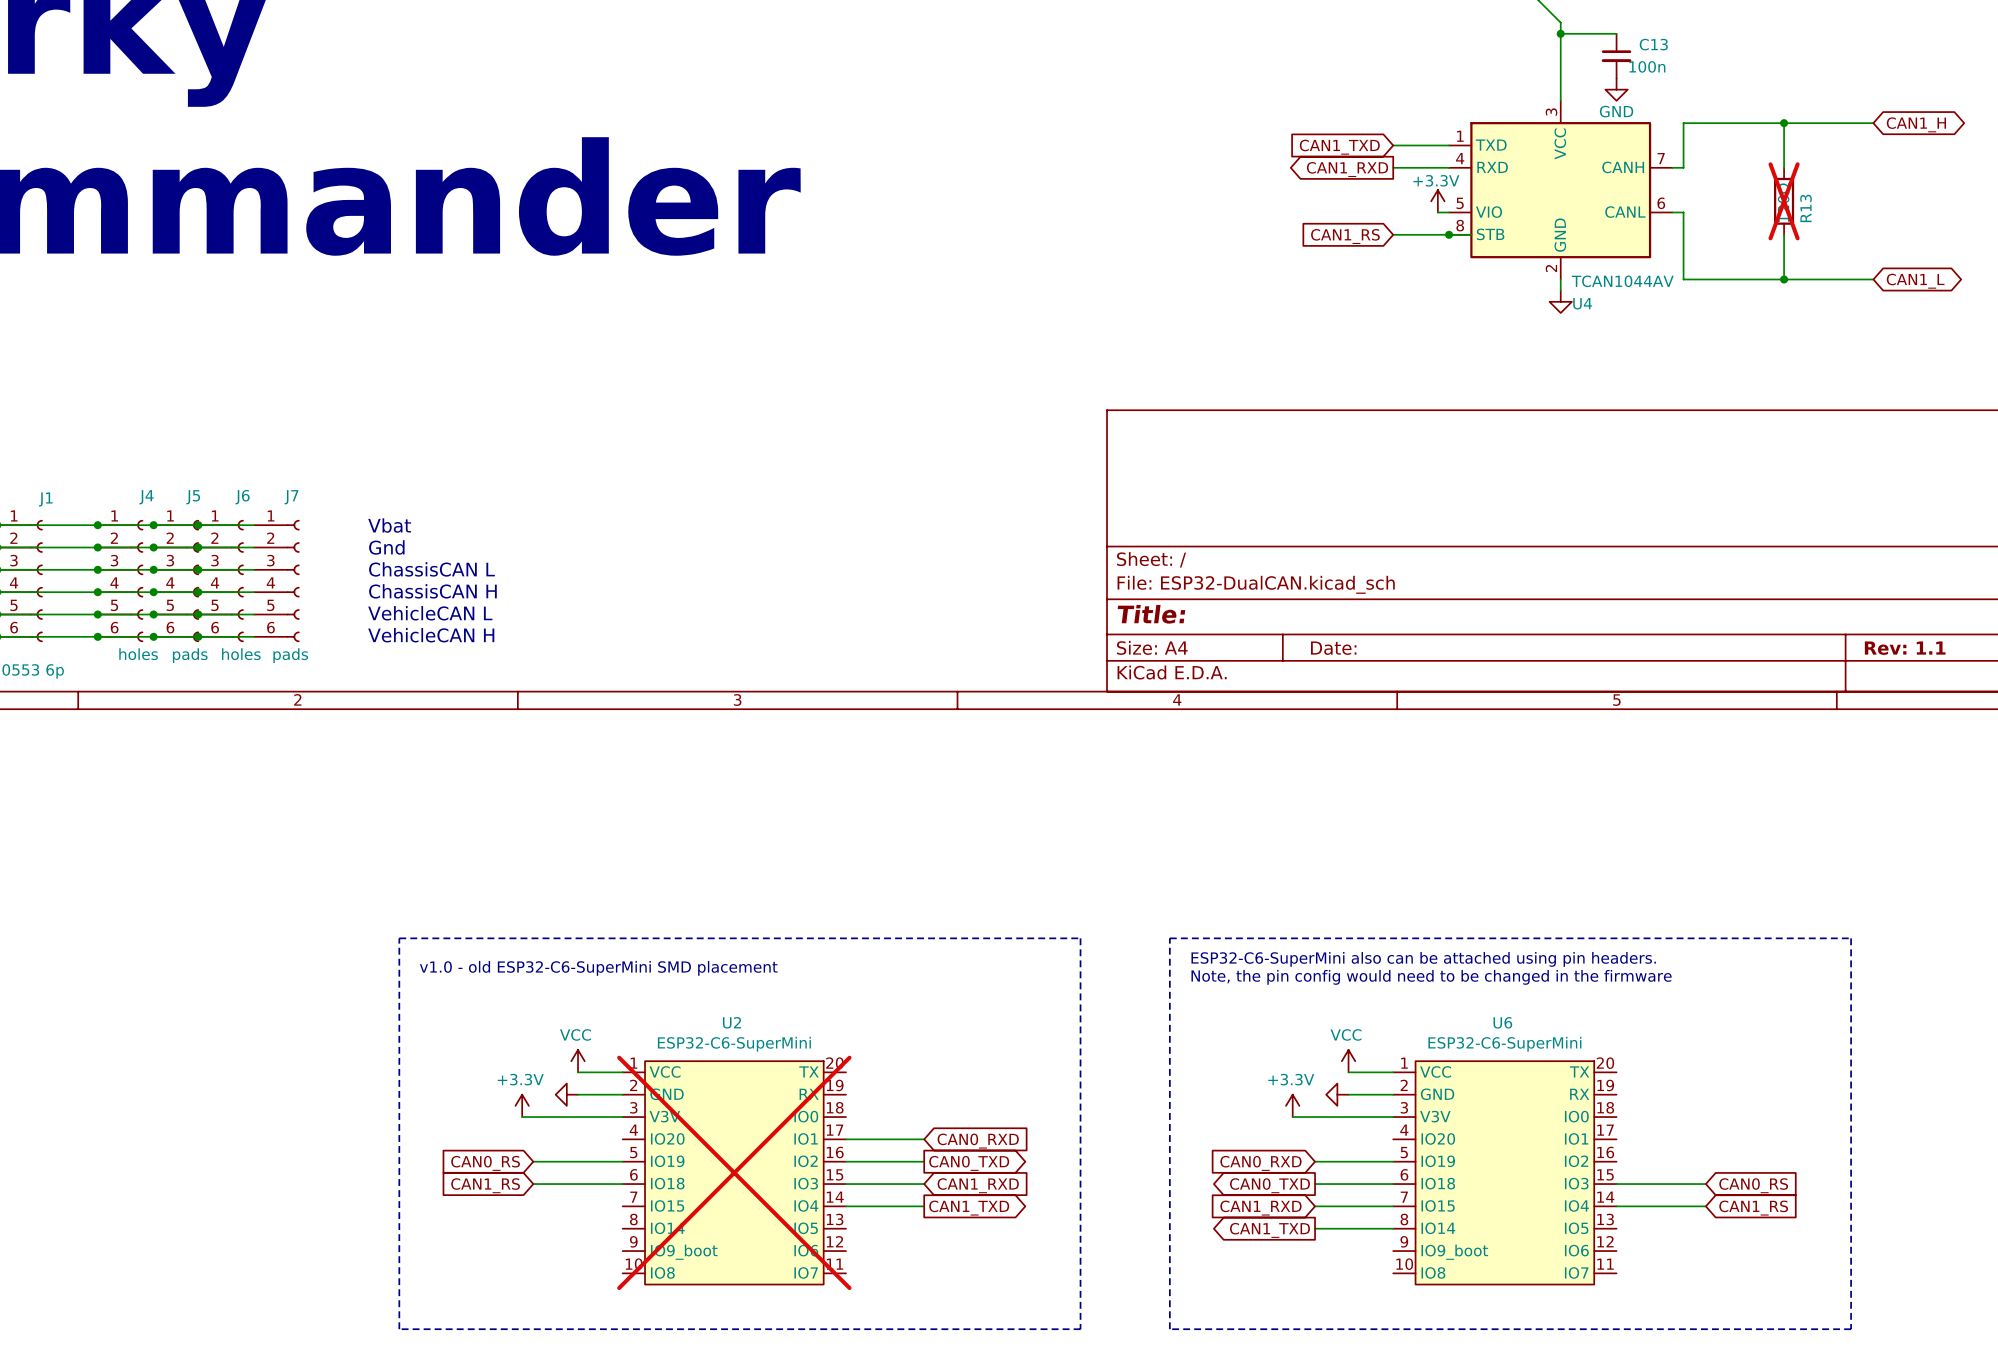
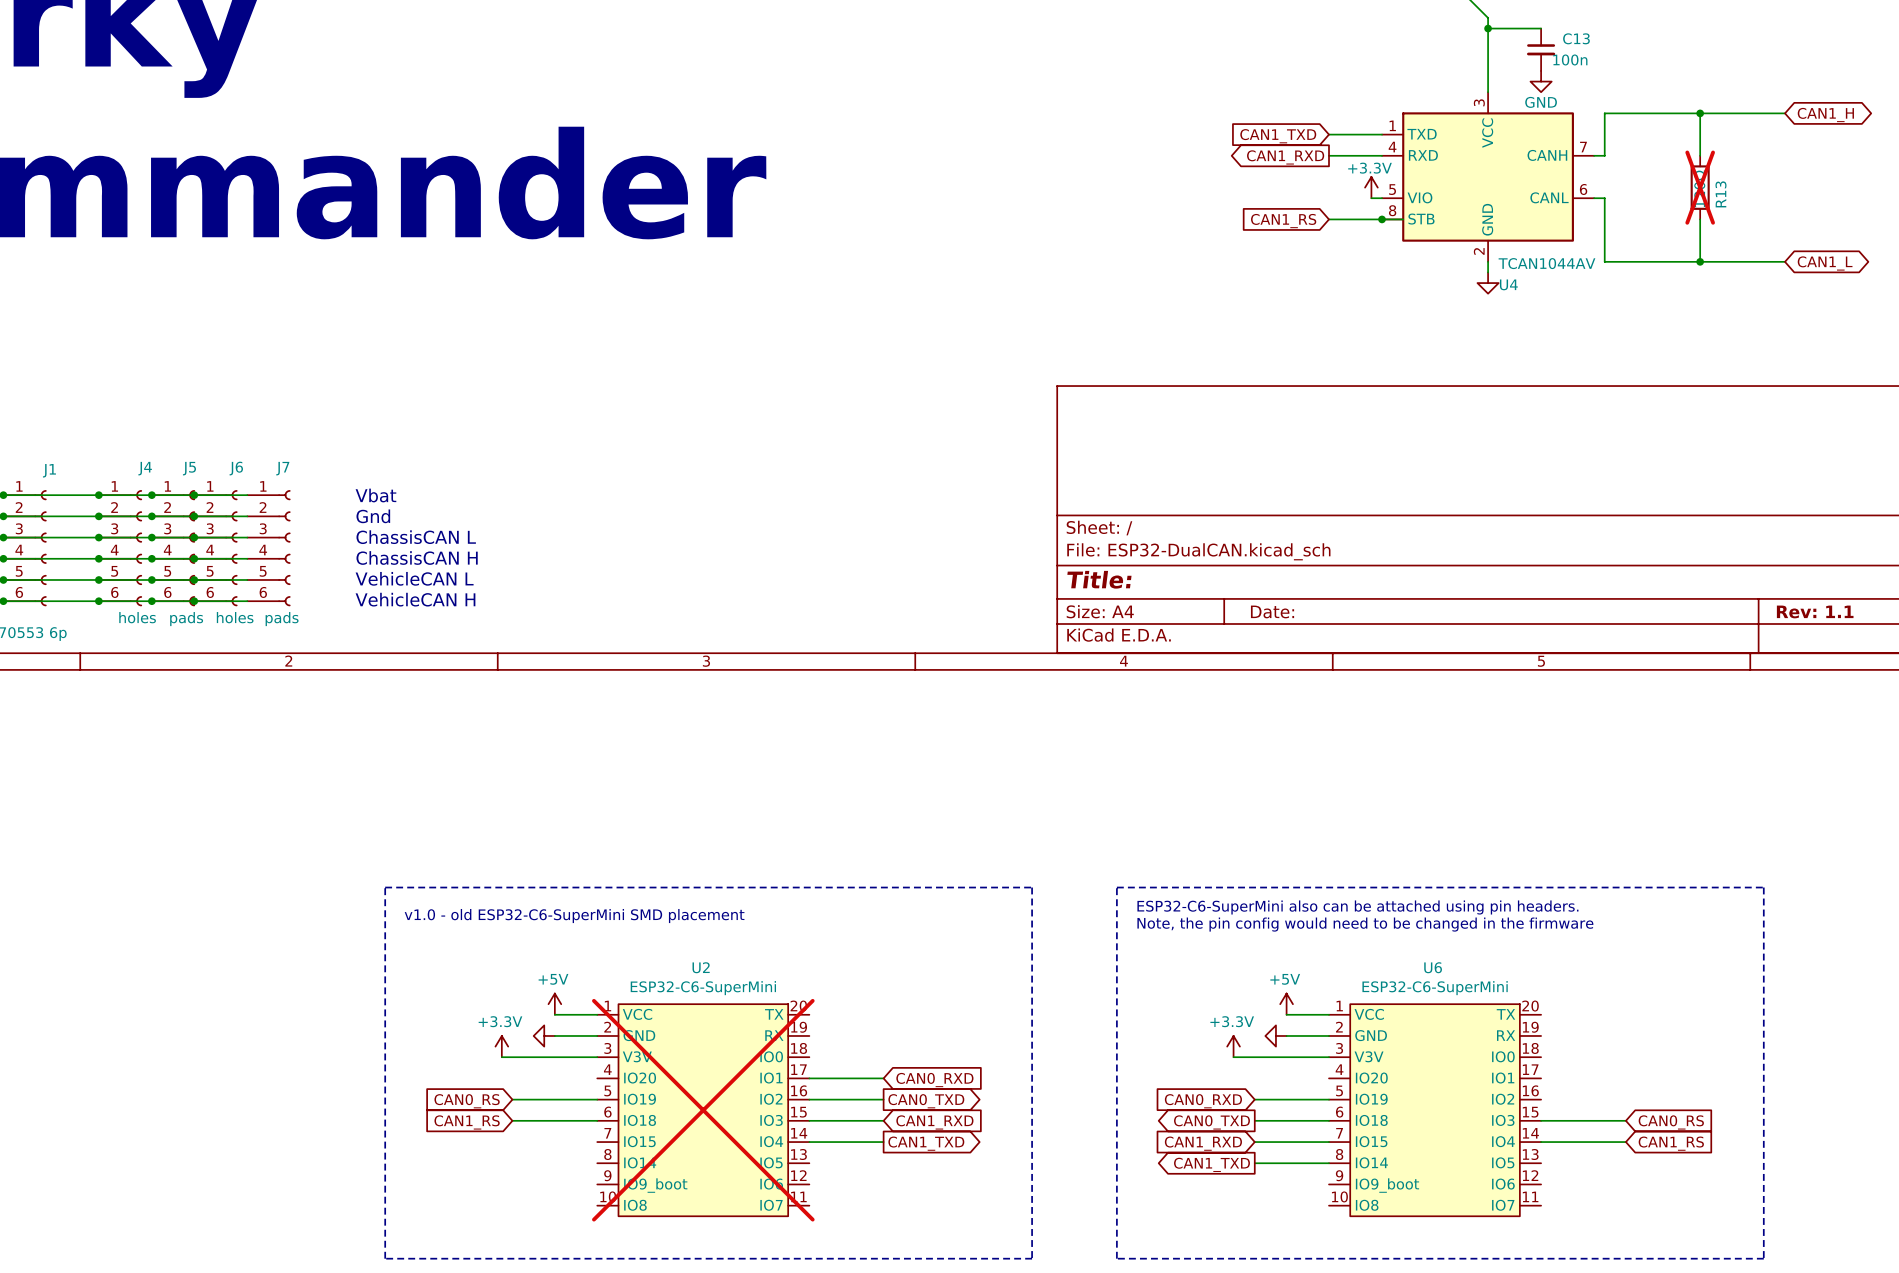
power symbol: VCC (578, 1061) -> +5V (554, 1004)
power symbol: VCC (1348, 1061) -> +5V (1286, 1004)

